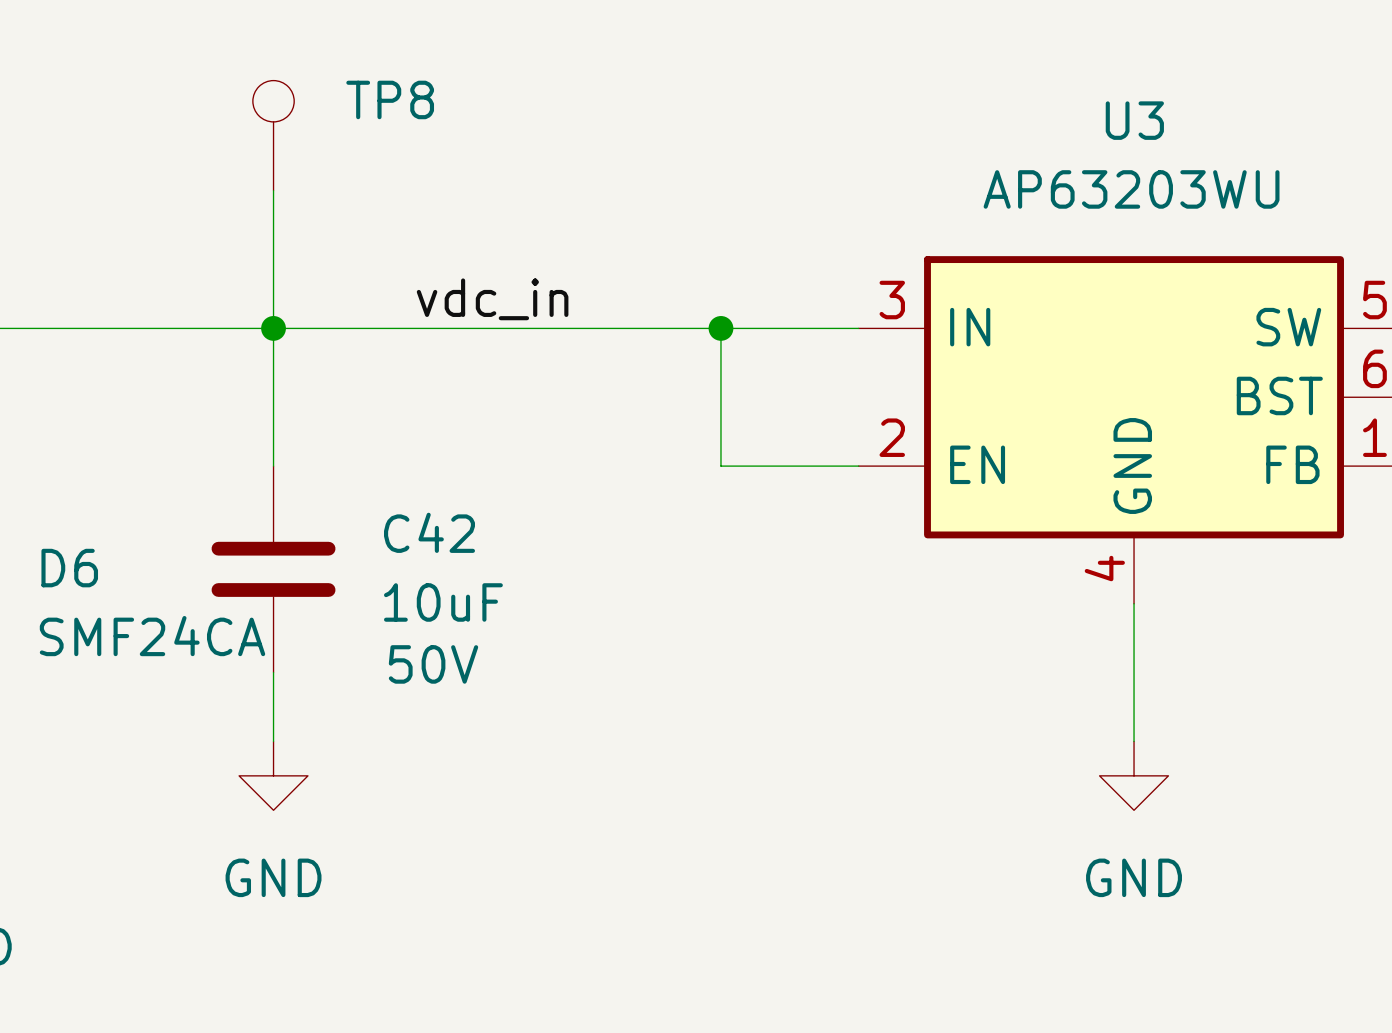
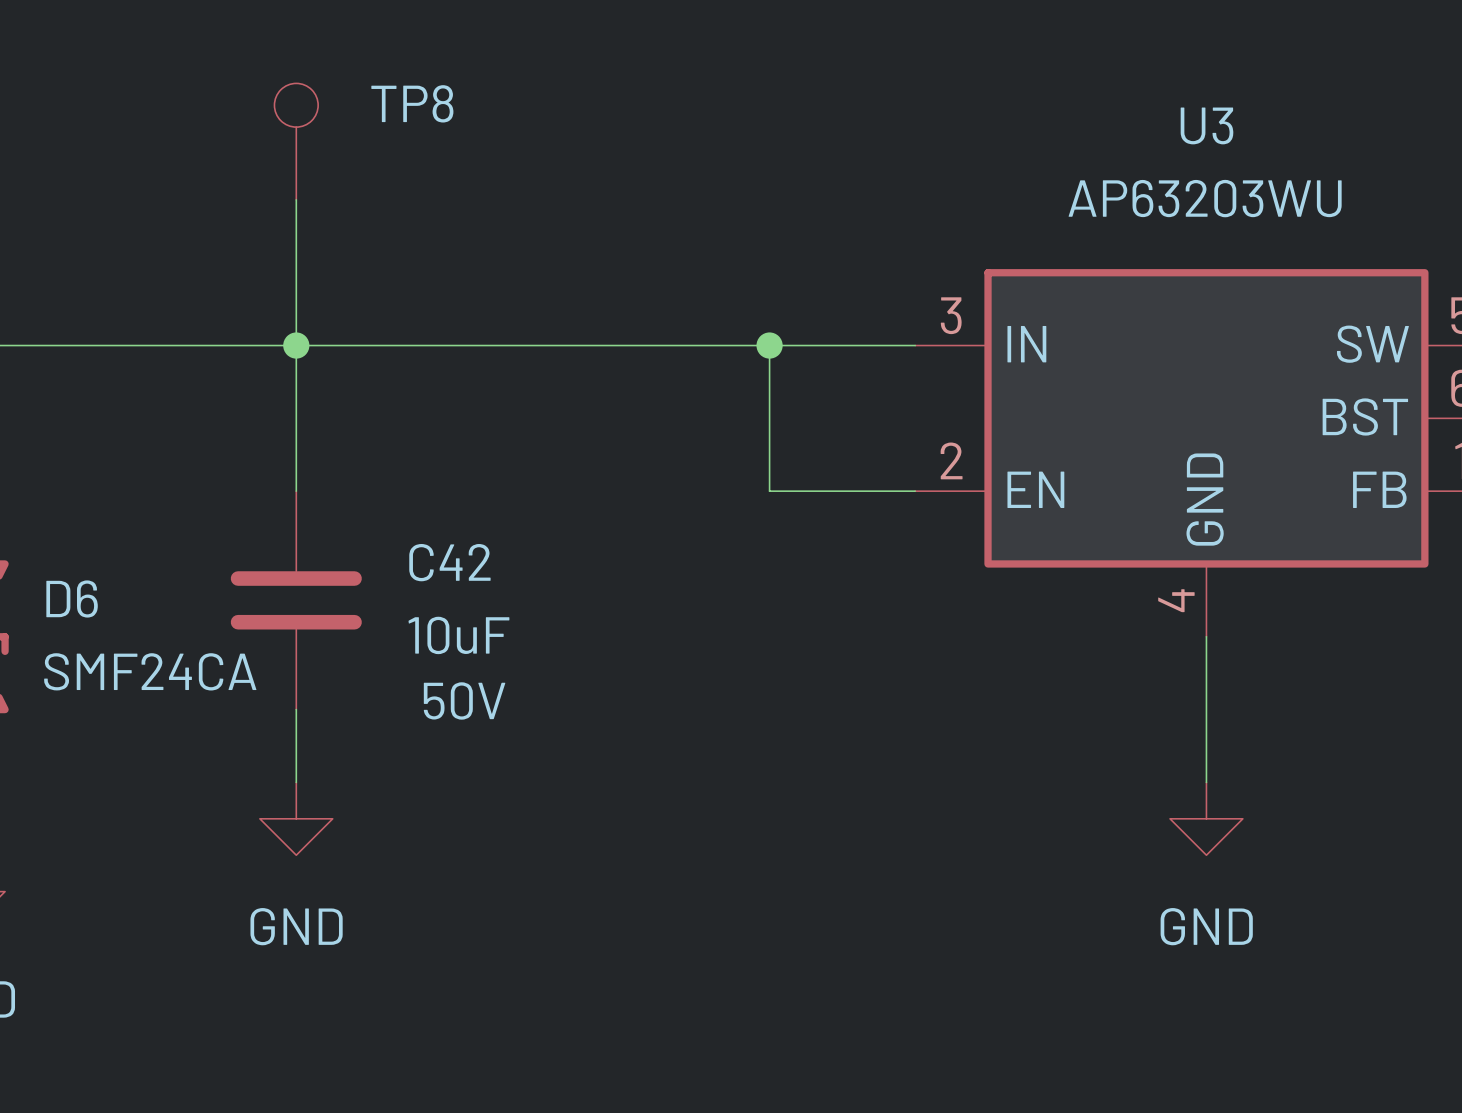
label: vdc_in (492, 299) -> none

